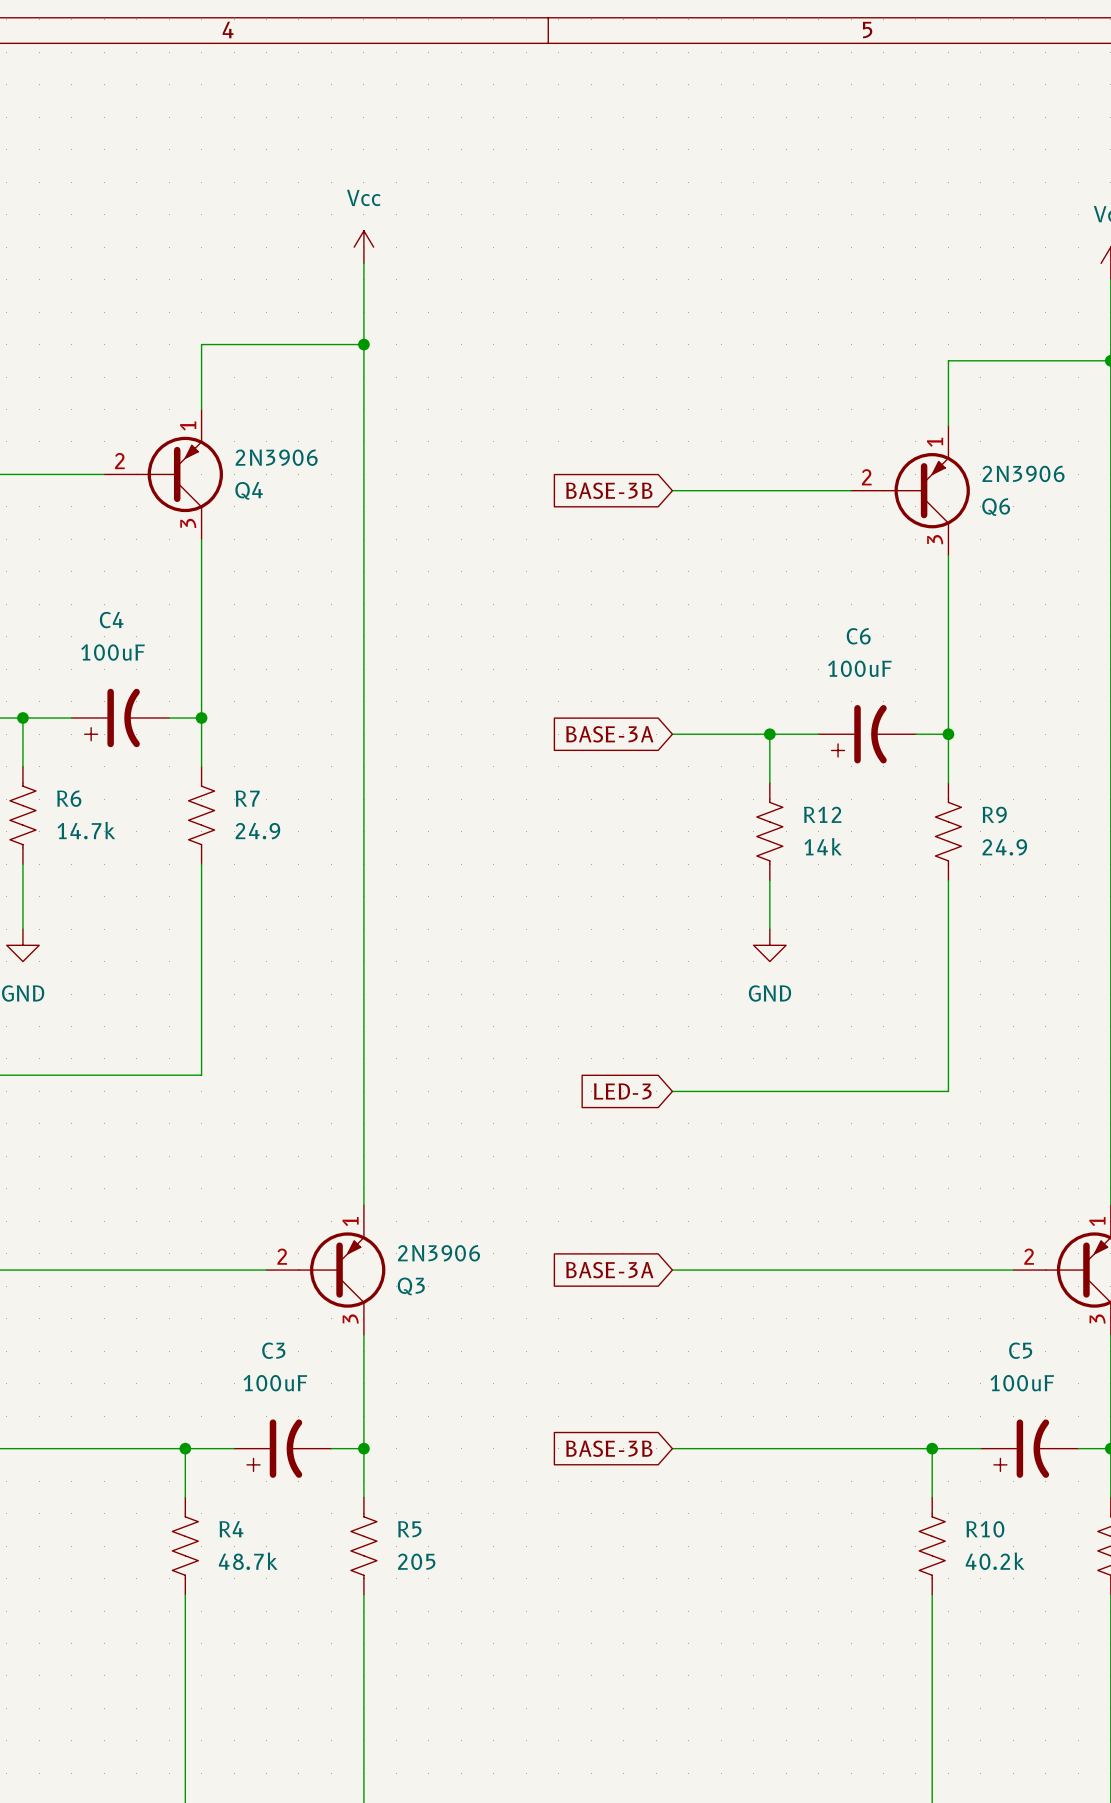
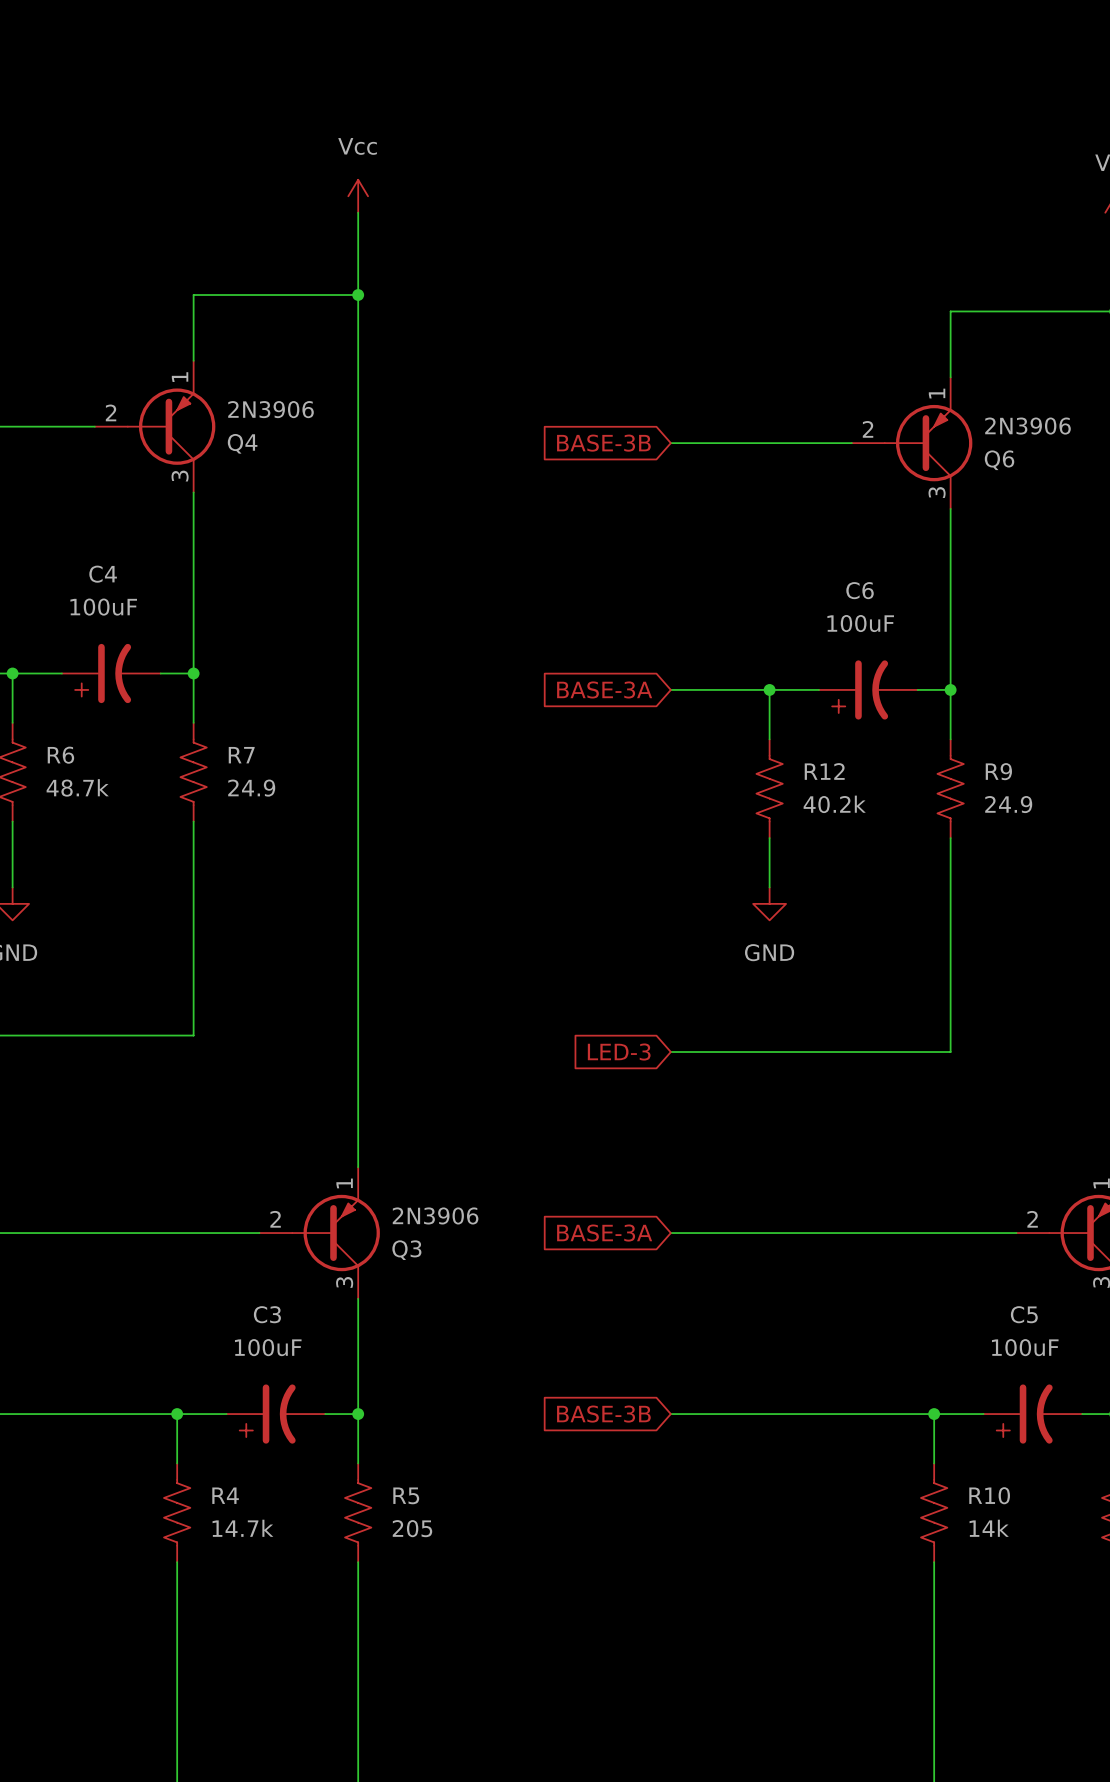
R6 value: 14.7k (86, 830) -> 48.7k (77, 787)
R12 value: 14k (823, 846) -> 40.2k (834, 804)
R4 value: 48.7k (248, 1561) -> 14.7k (242, 1528)
R10 value: 40.2k (995, 1561) -> 14k (989, 1528)

